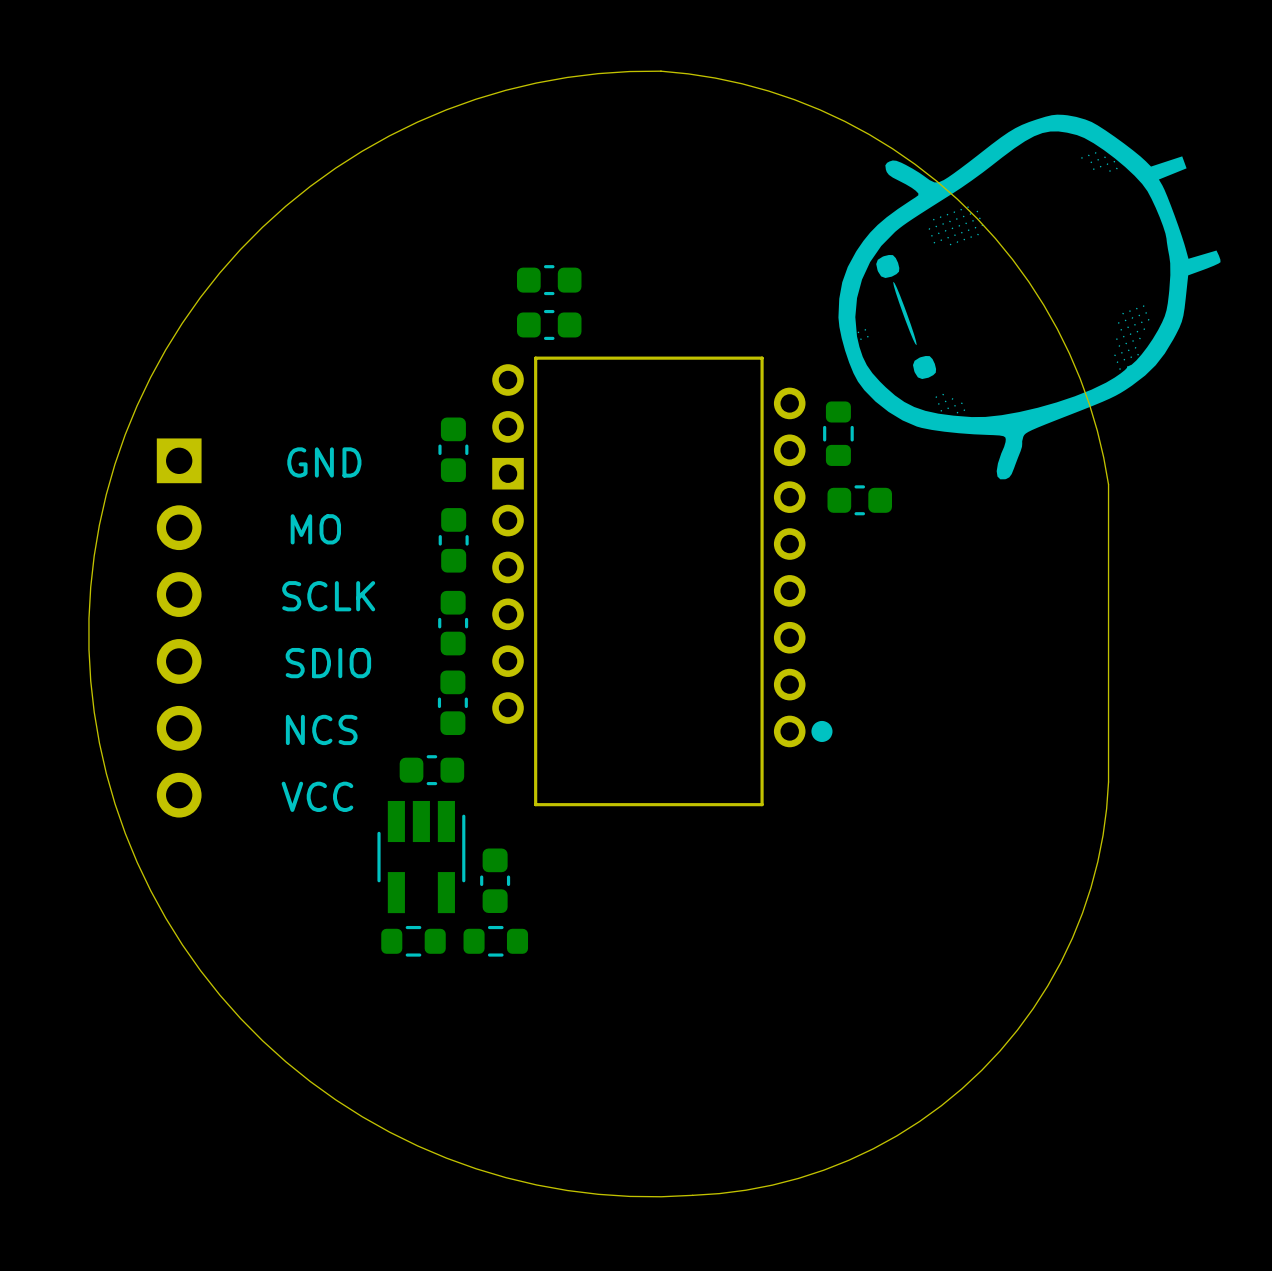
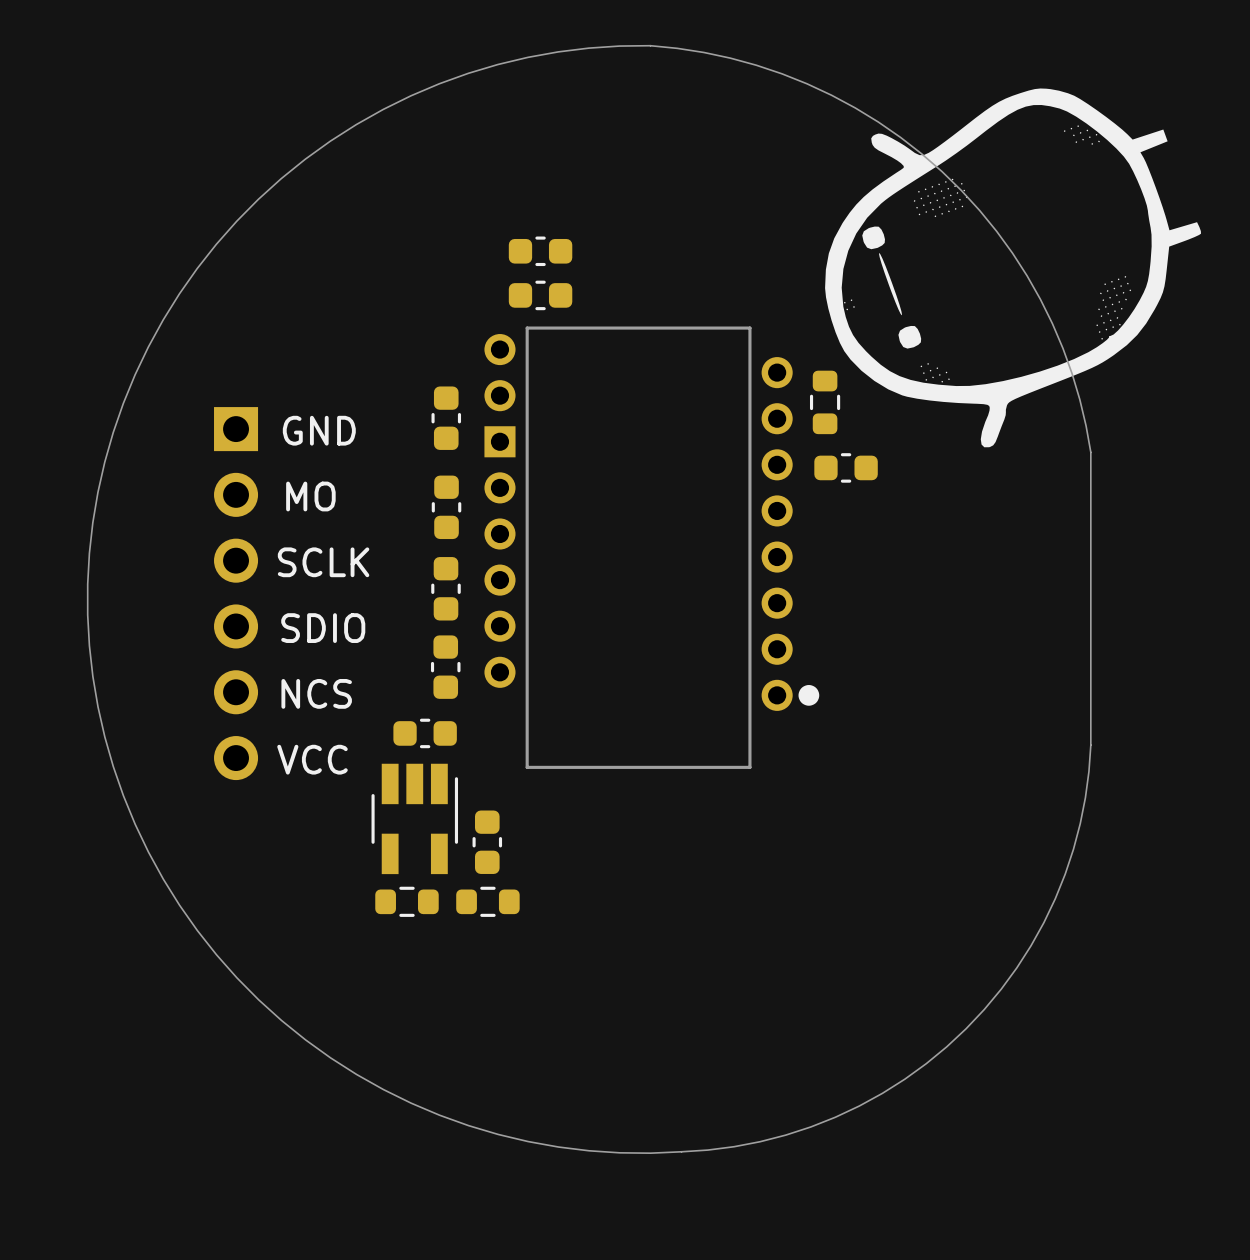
part position: (179, 628) -> (236, 593)

